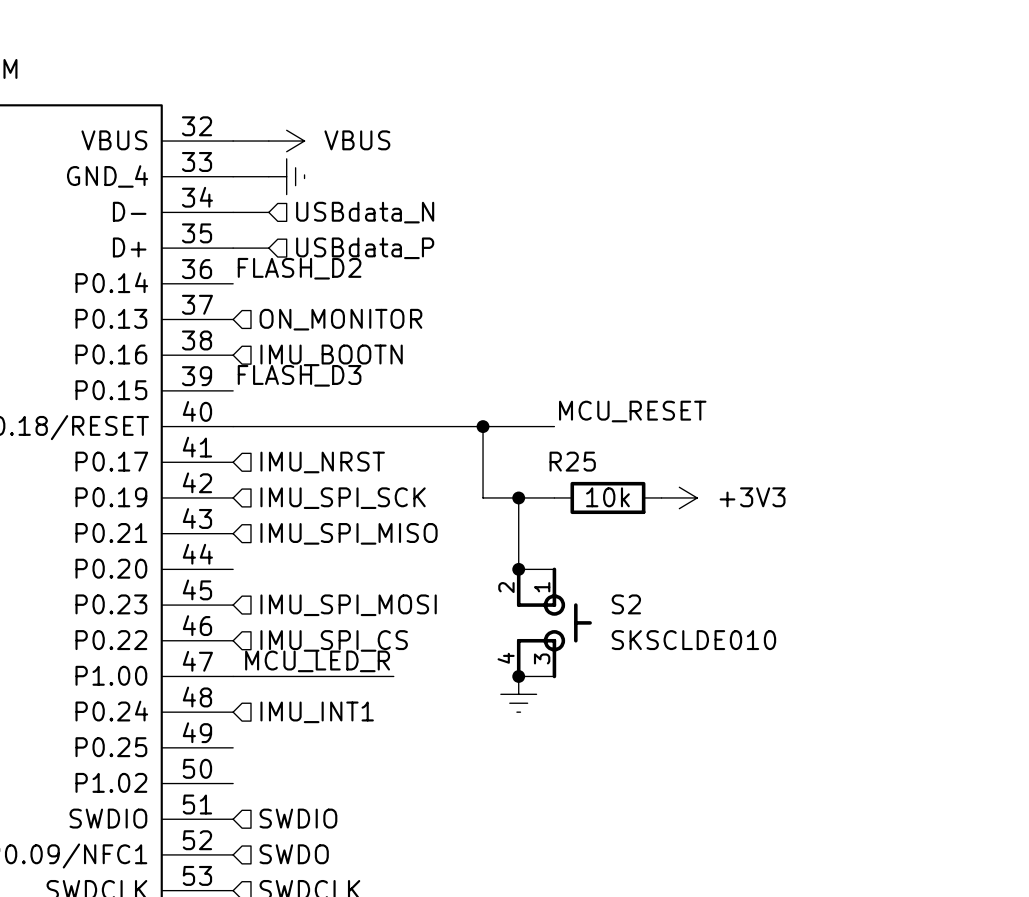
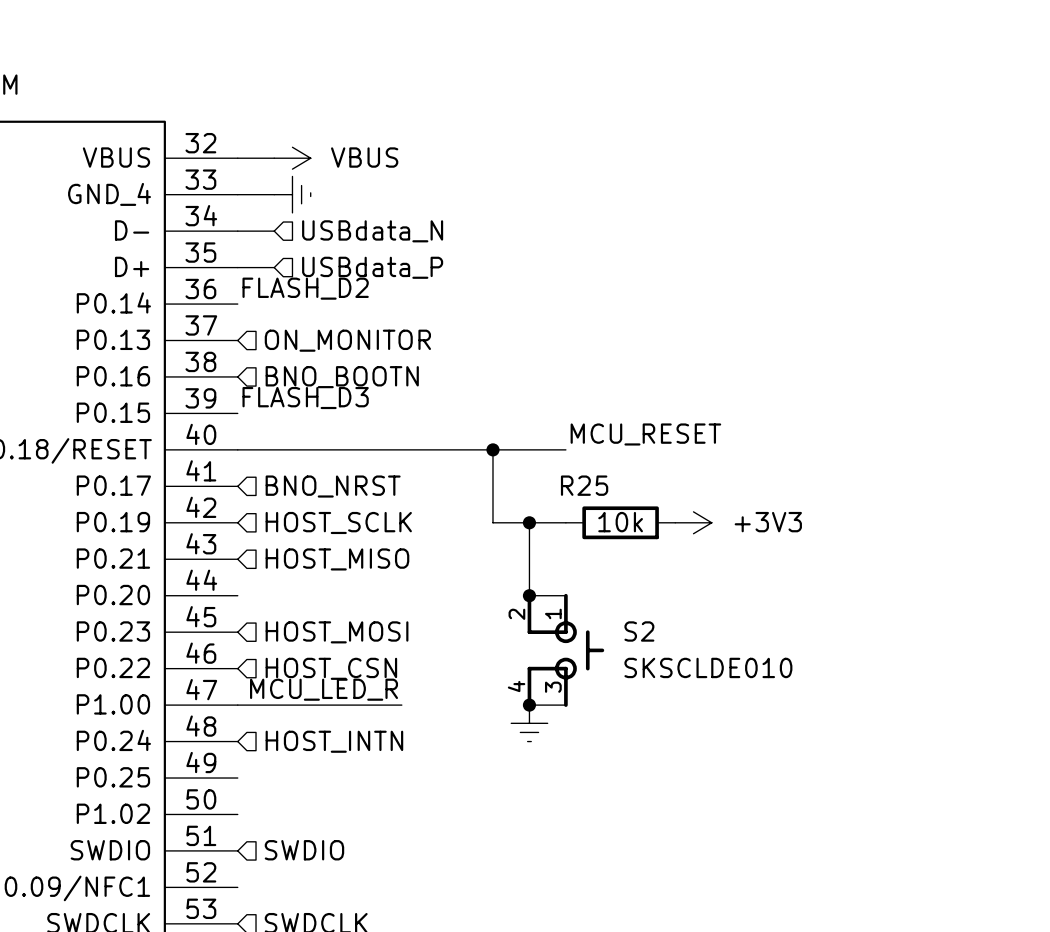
hierarchical label: IMU_BOOTN (331, 355) -> BNO_BOOTN (342, 377)
hierarchical label: IMU_NRST (322, 462) -> BNO_NRST (333, 486)
hierarchical label: IMU_SPI_SCK (343, 498) -> HOST_SCLK (338, 522)
hierarchical label: IMU_SPI_MISO (349, 533) -> HOST_MISO (337, 559)
hierarchical label: IMU_SPI_MOSI (348, 605) -> HOST_MOSI (337, 632)
hierarchical label: IMU_SPI_CS (334, 640) -> HOST_CSN (331, 668)
hierarchical label: IMU_INT1 (317, 712) -> HOST_INTN (334, 741)
hierarchical label: SWDO (294, 854) -> none

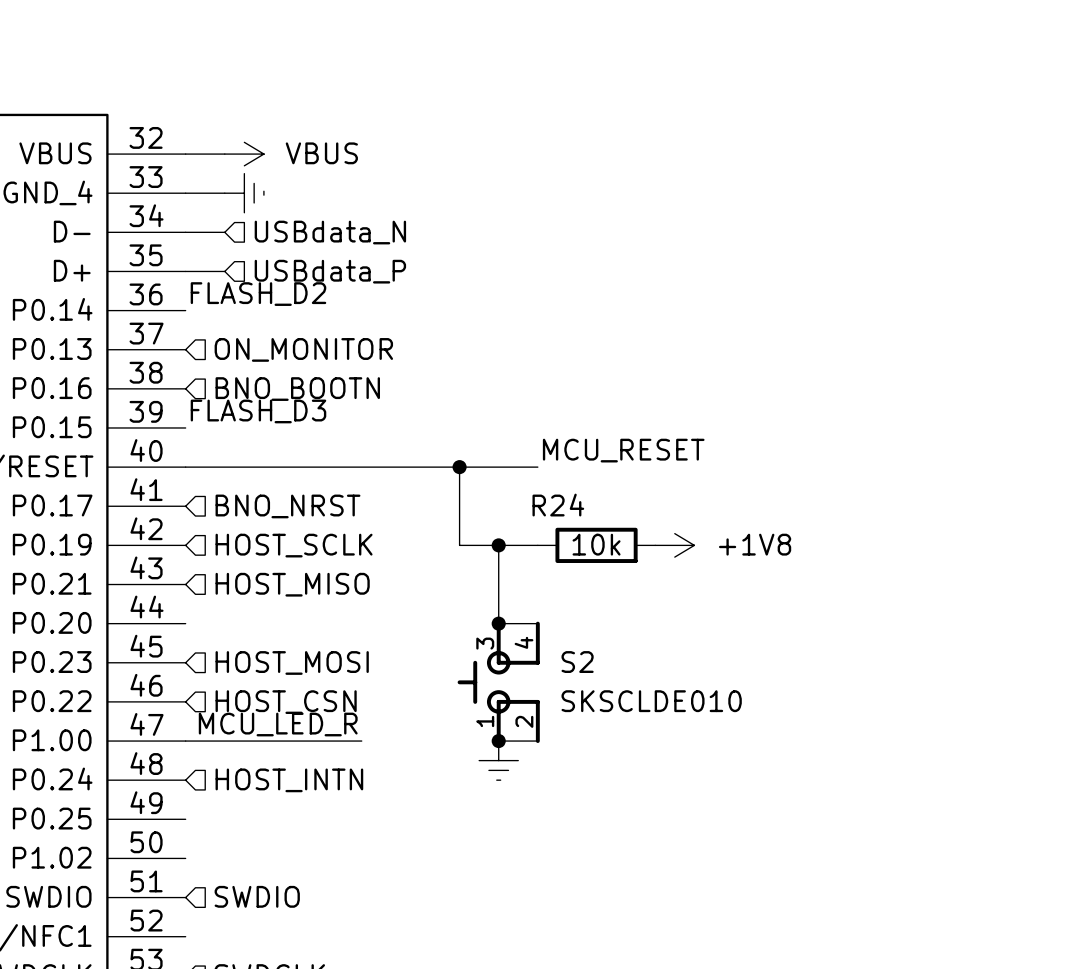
R25 name: R25 (584, 485) -> R24 (558, 505)
power symbol: +3V3 (693, 522) -> +1V8 (674, 545)
S2 rotation: 0° (565, 650) -> 180° (498, 682)

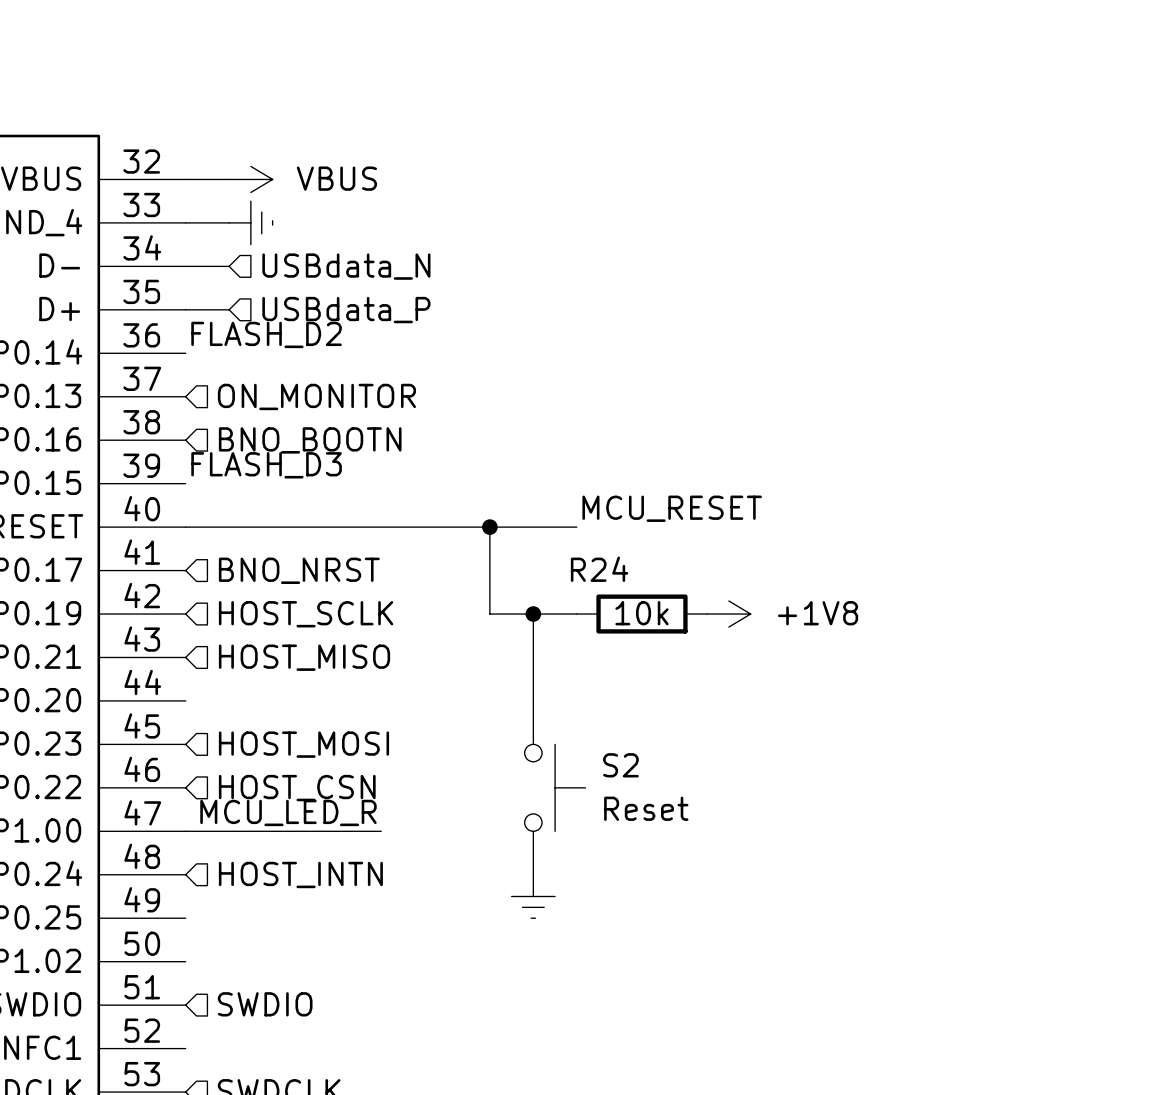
S2 symbol: [457, 621, 540, 743] -> [524, 700, 586, 875]
wire: (498, 623) (537, 623) -> none
junction: (498, 623) -> none
S2 value: SKSCLDE010 (651, 701) -> Reset (646, 808)
wire: (498, 741) (537, 741) -> none
junction: (498, 741) -> none
power symbol position: (498, 760) -> (533, 896)

